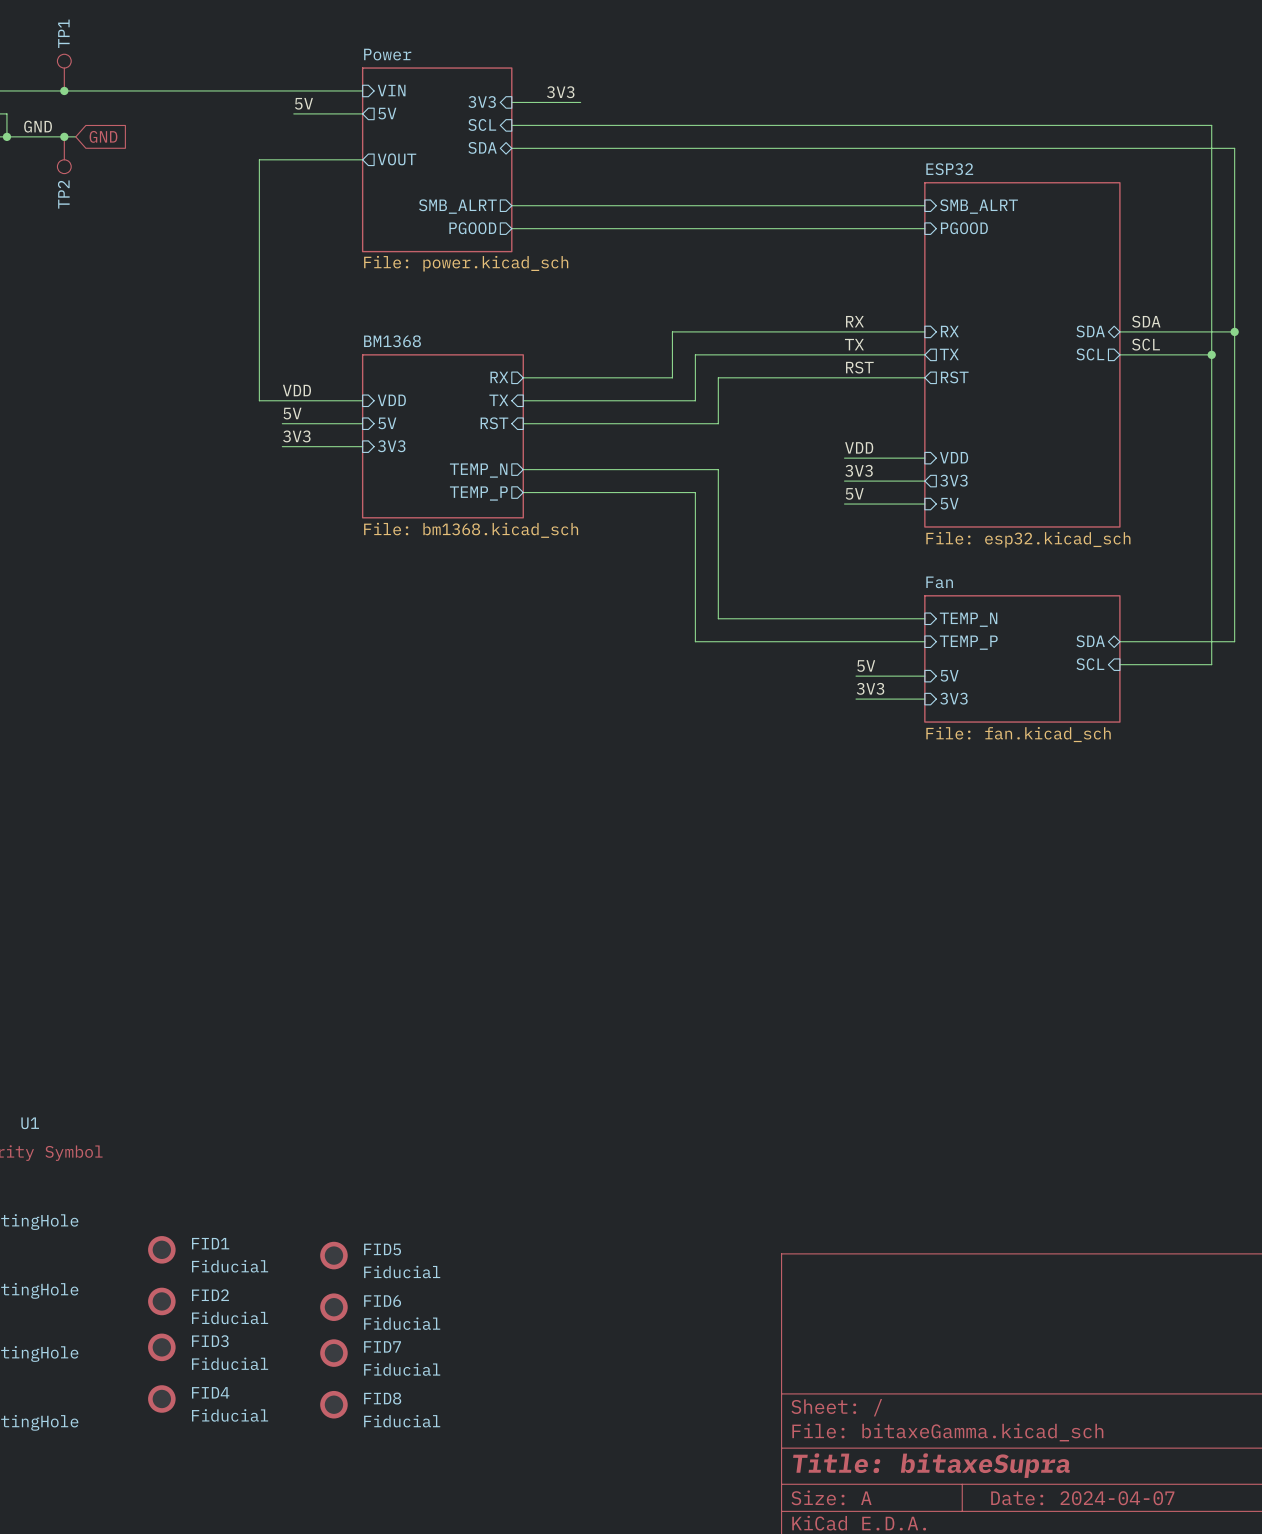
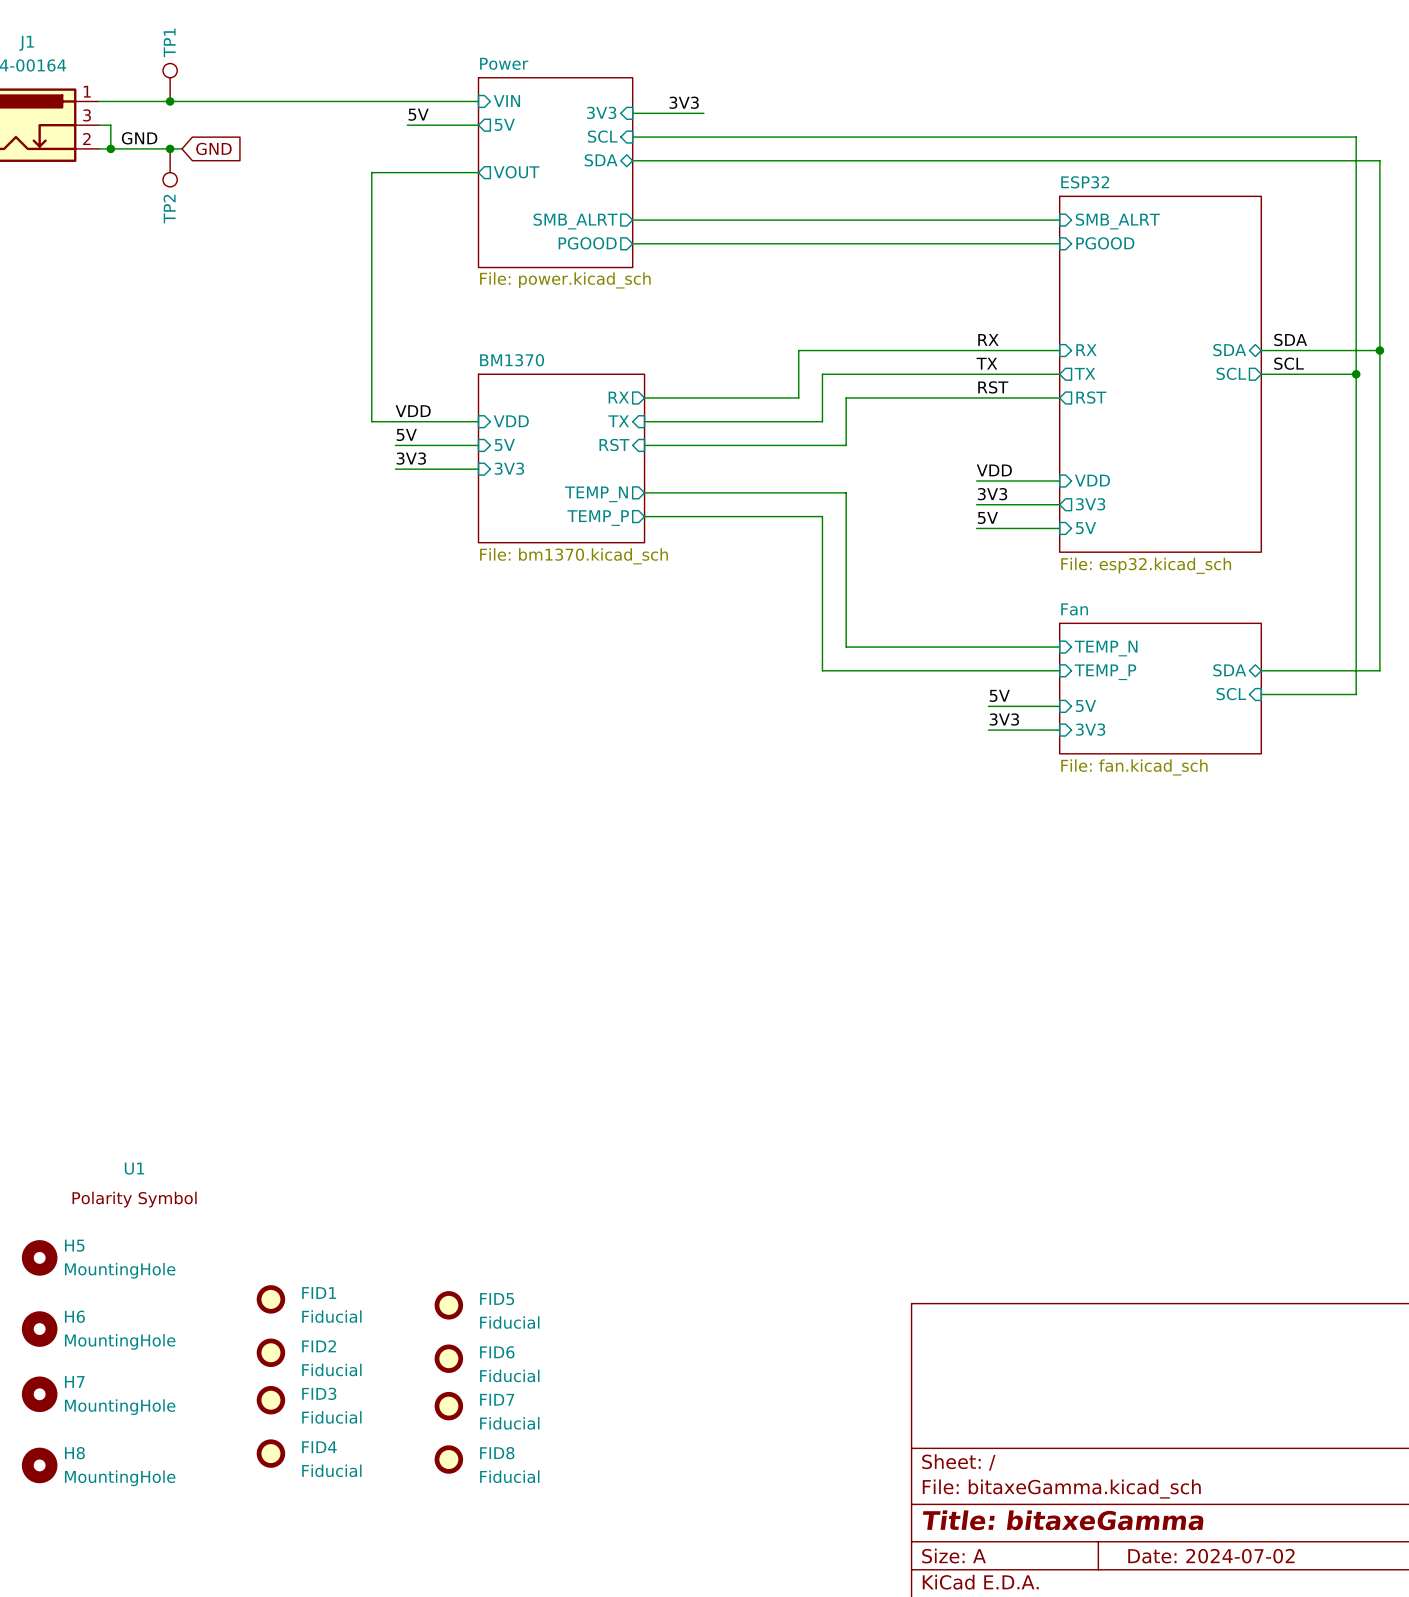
sheet BM1368 name: BM1368 (392, 341) -> BM1370 (512, 360)
sheet BM1368 value: File: bm1368.kicad_sch (471, 530) -> File: bm1370.kicad_sch (574, 556)
title block: Title: bitaxeSupra (931, 1465) -> Title: bitaxeGamma (1063, 1520)
title block: Date: 2024-04-07 (1082, 1498) -> Date: 2024-07-02 (1211, 1556)

